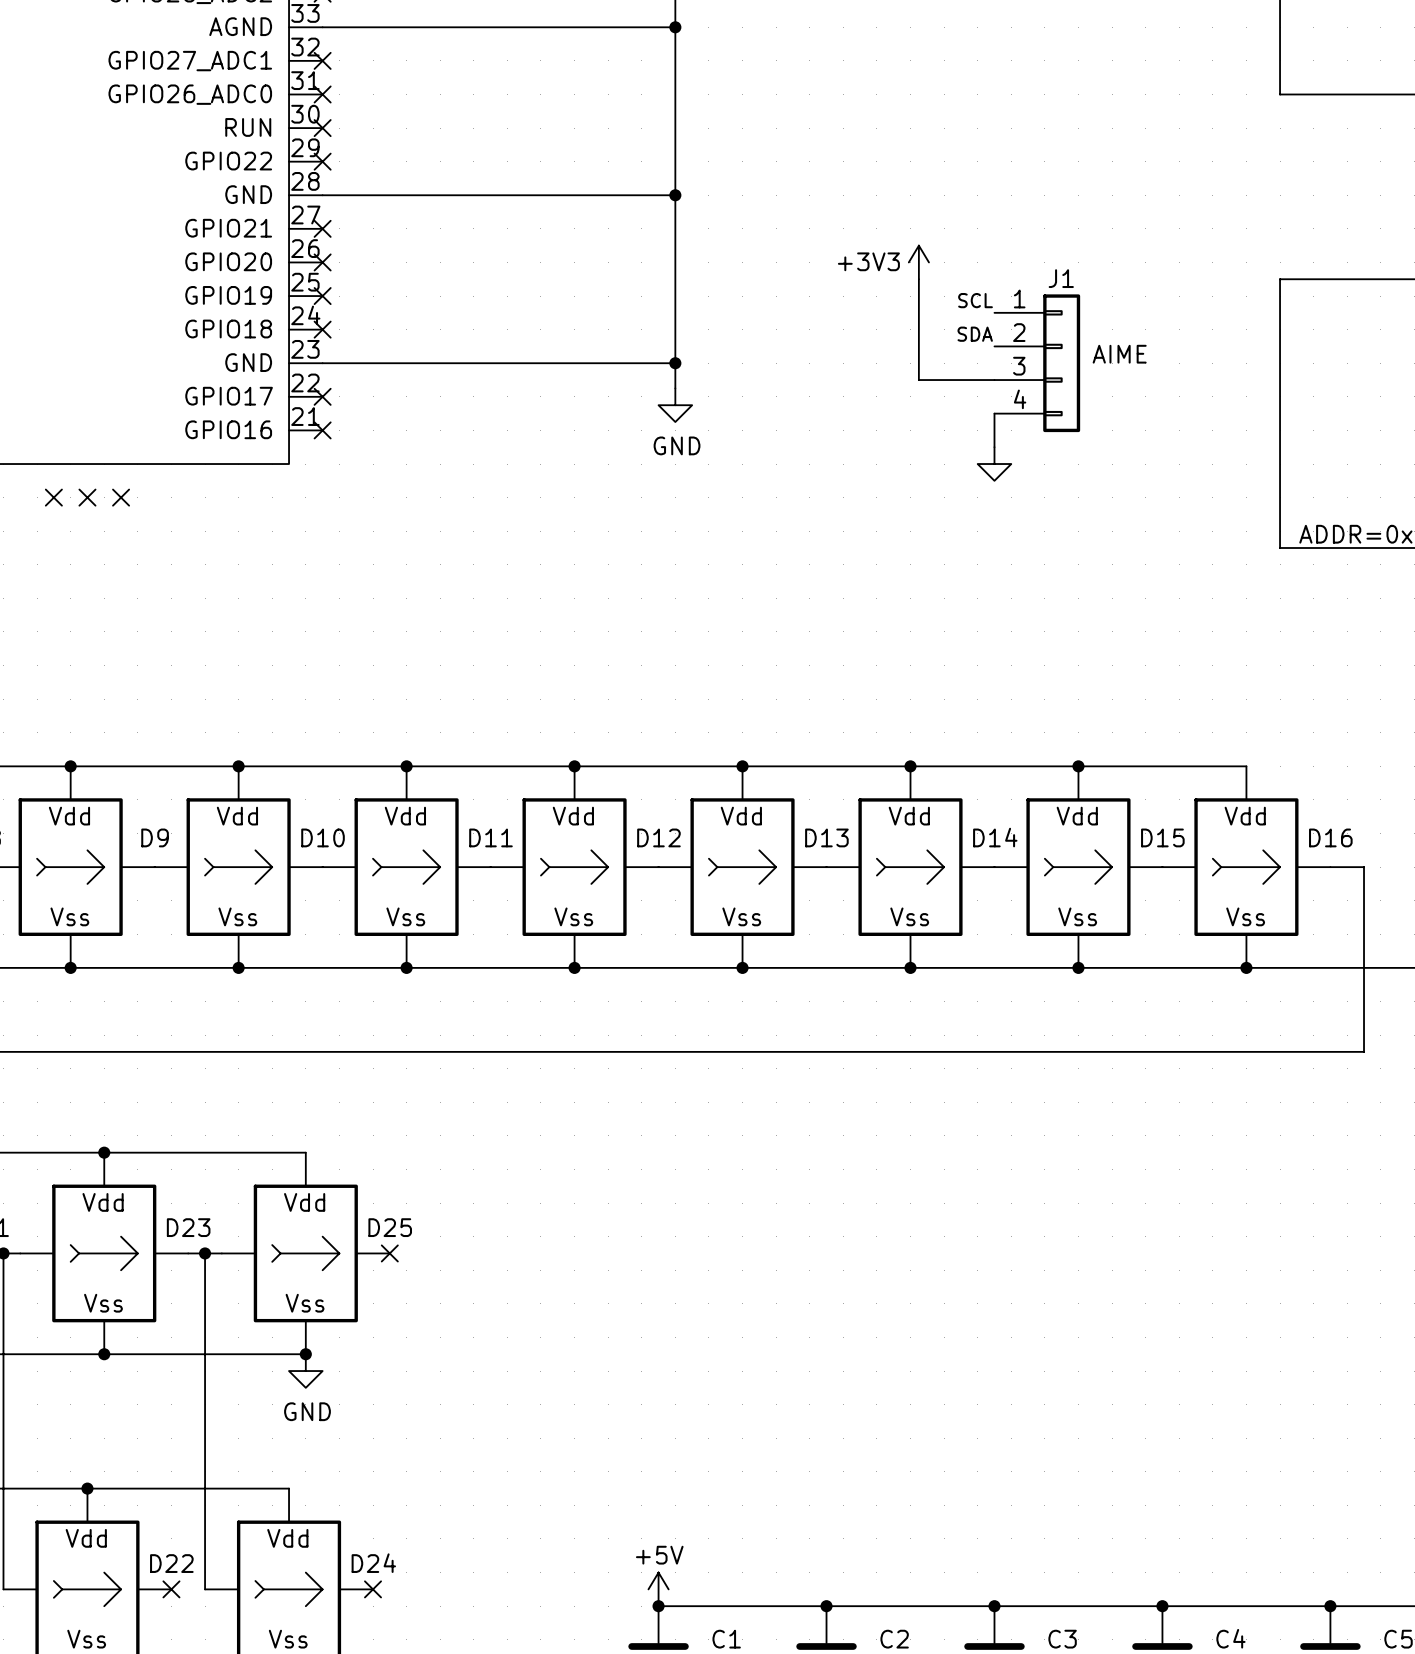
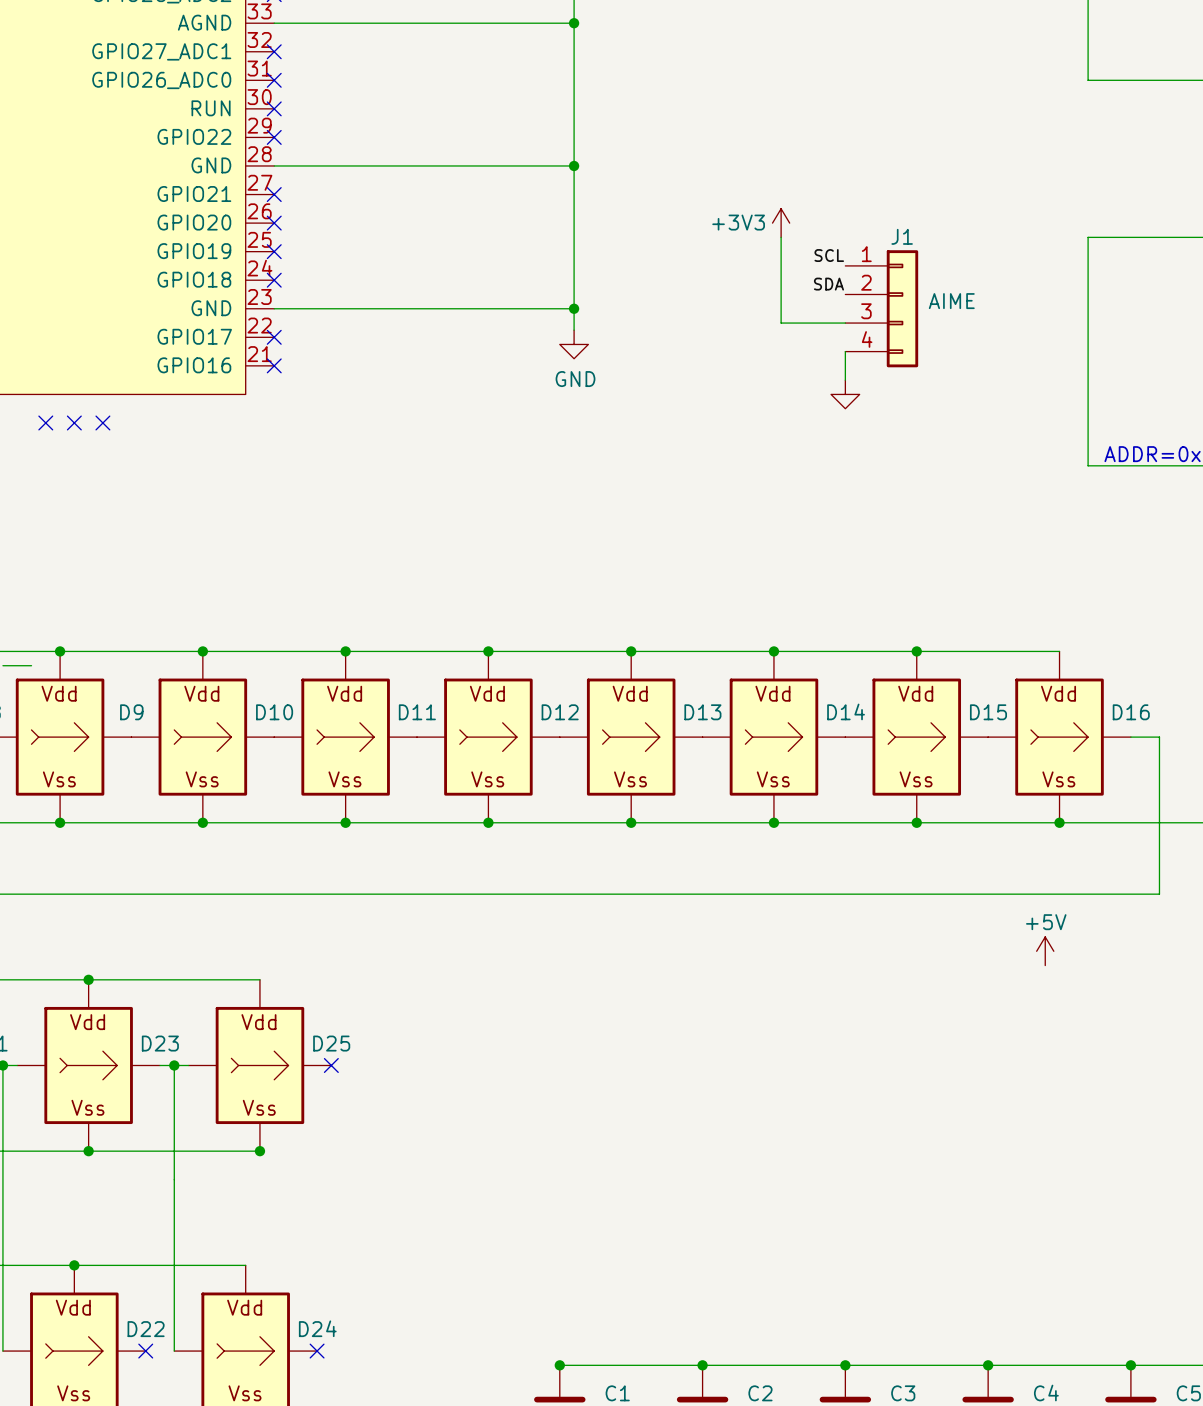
wire: none -> (2, 665) (31, 665)
power symbol: none -> +5V (1045, 951)
power symbol: GND (305, 1371) -> none
power symbol: +5V (658, 1589) -> none

